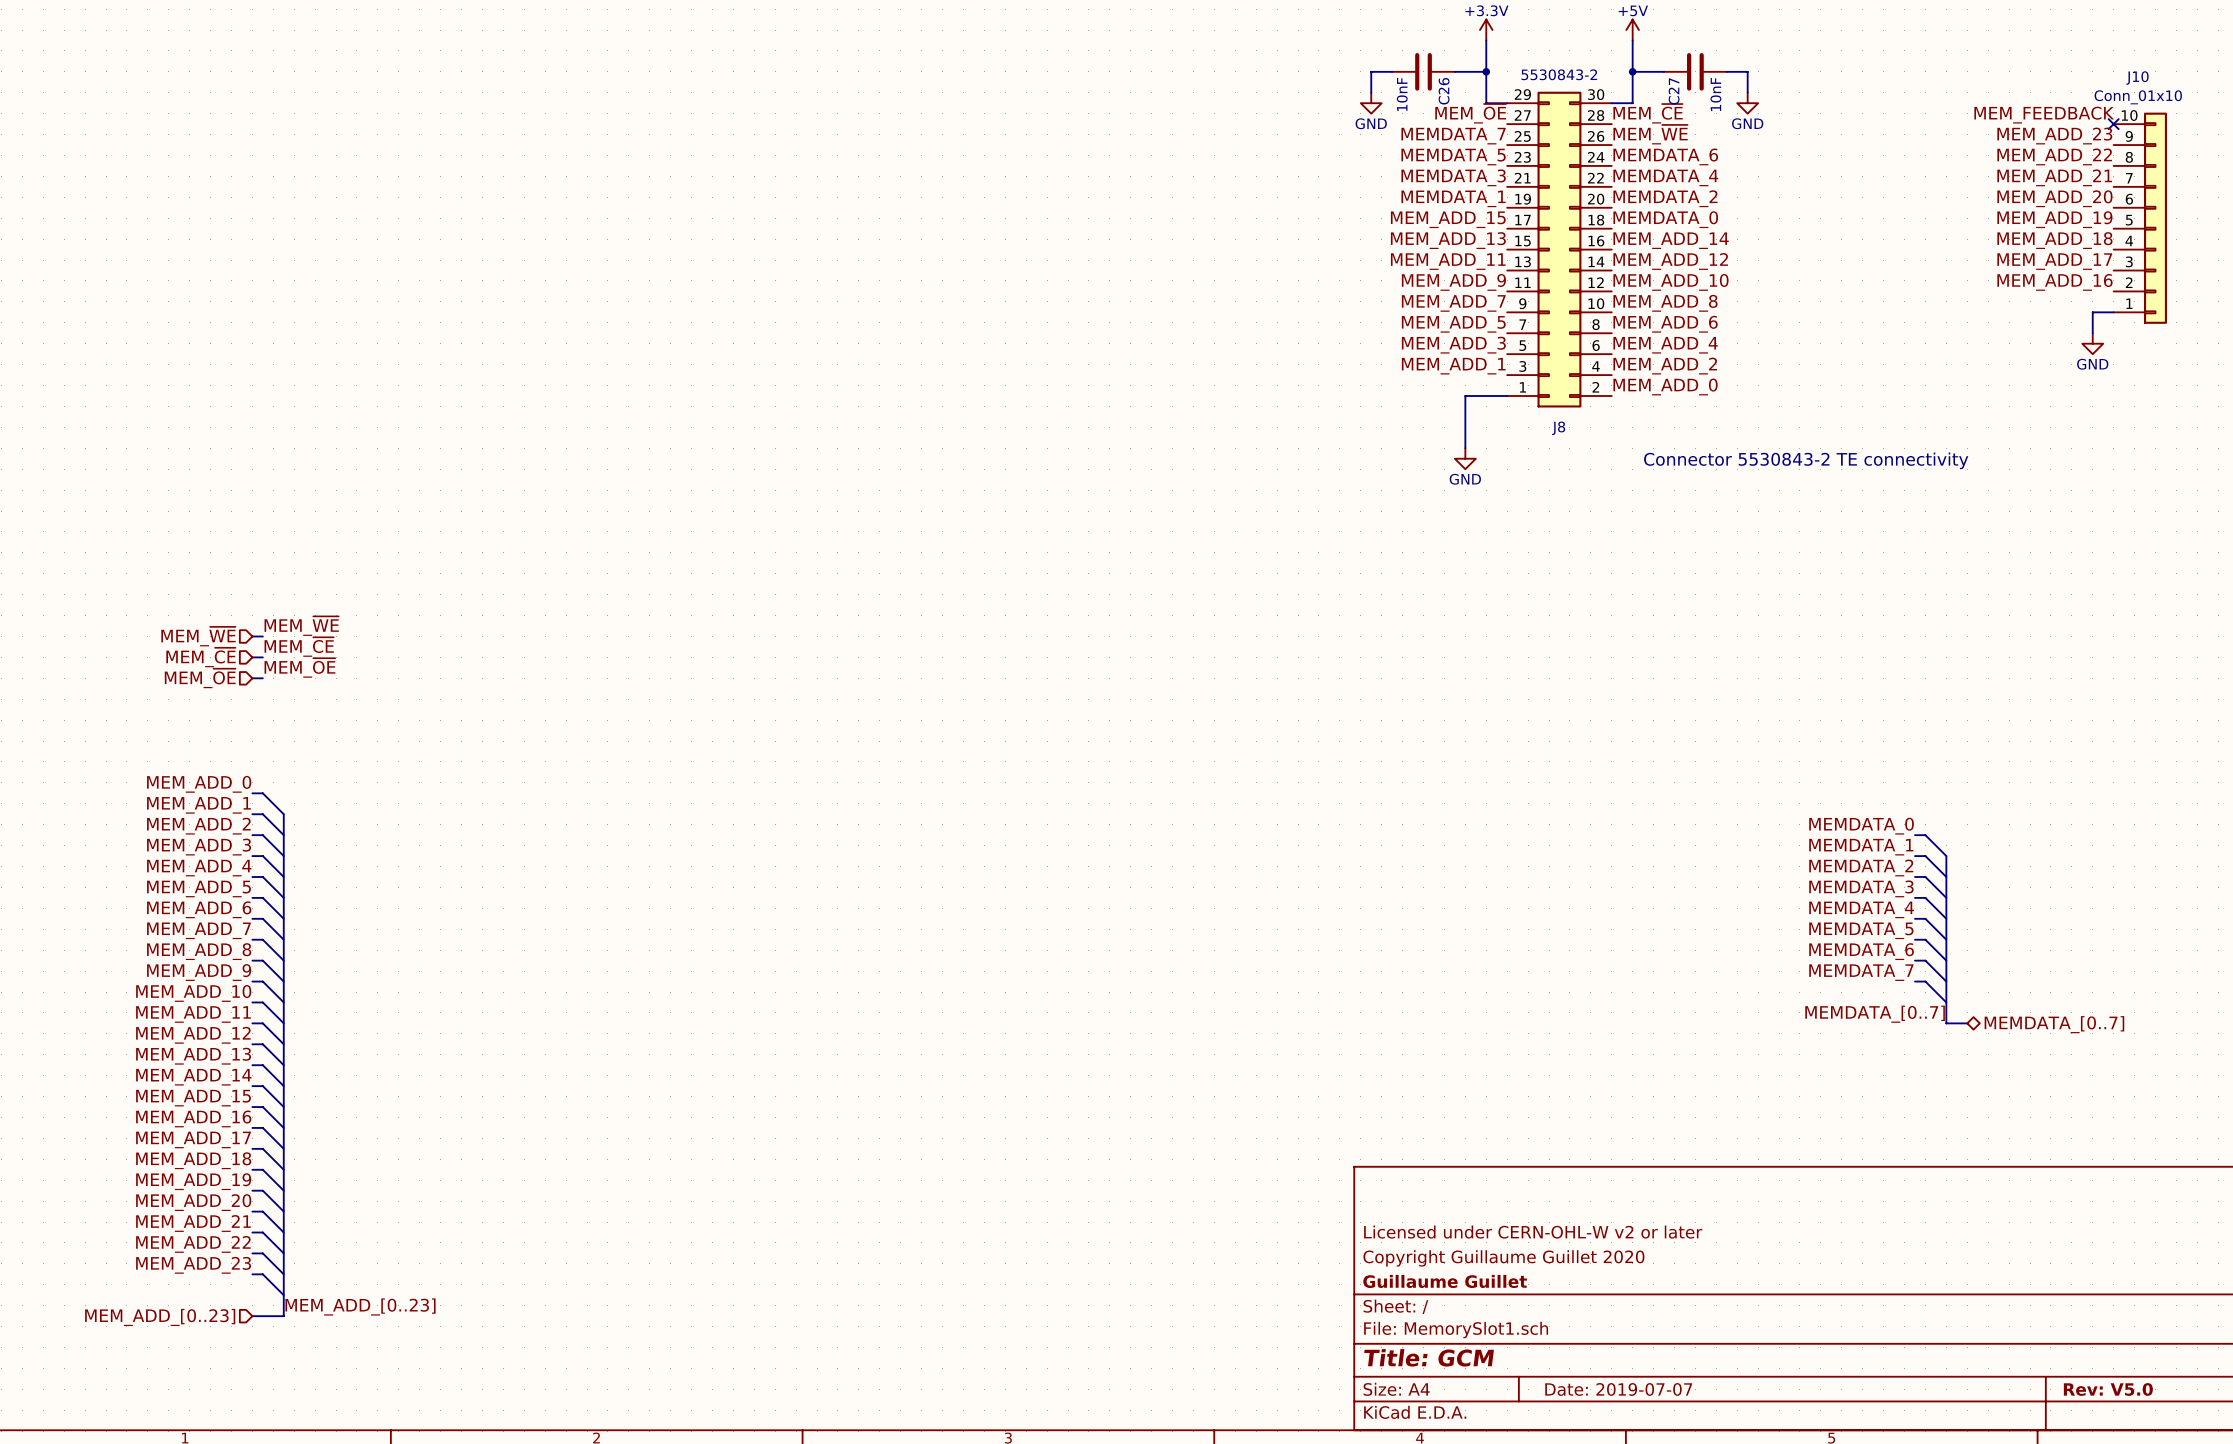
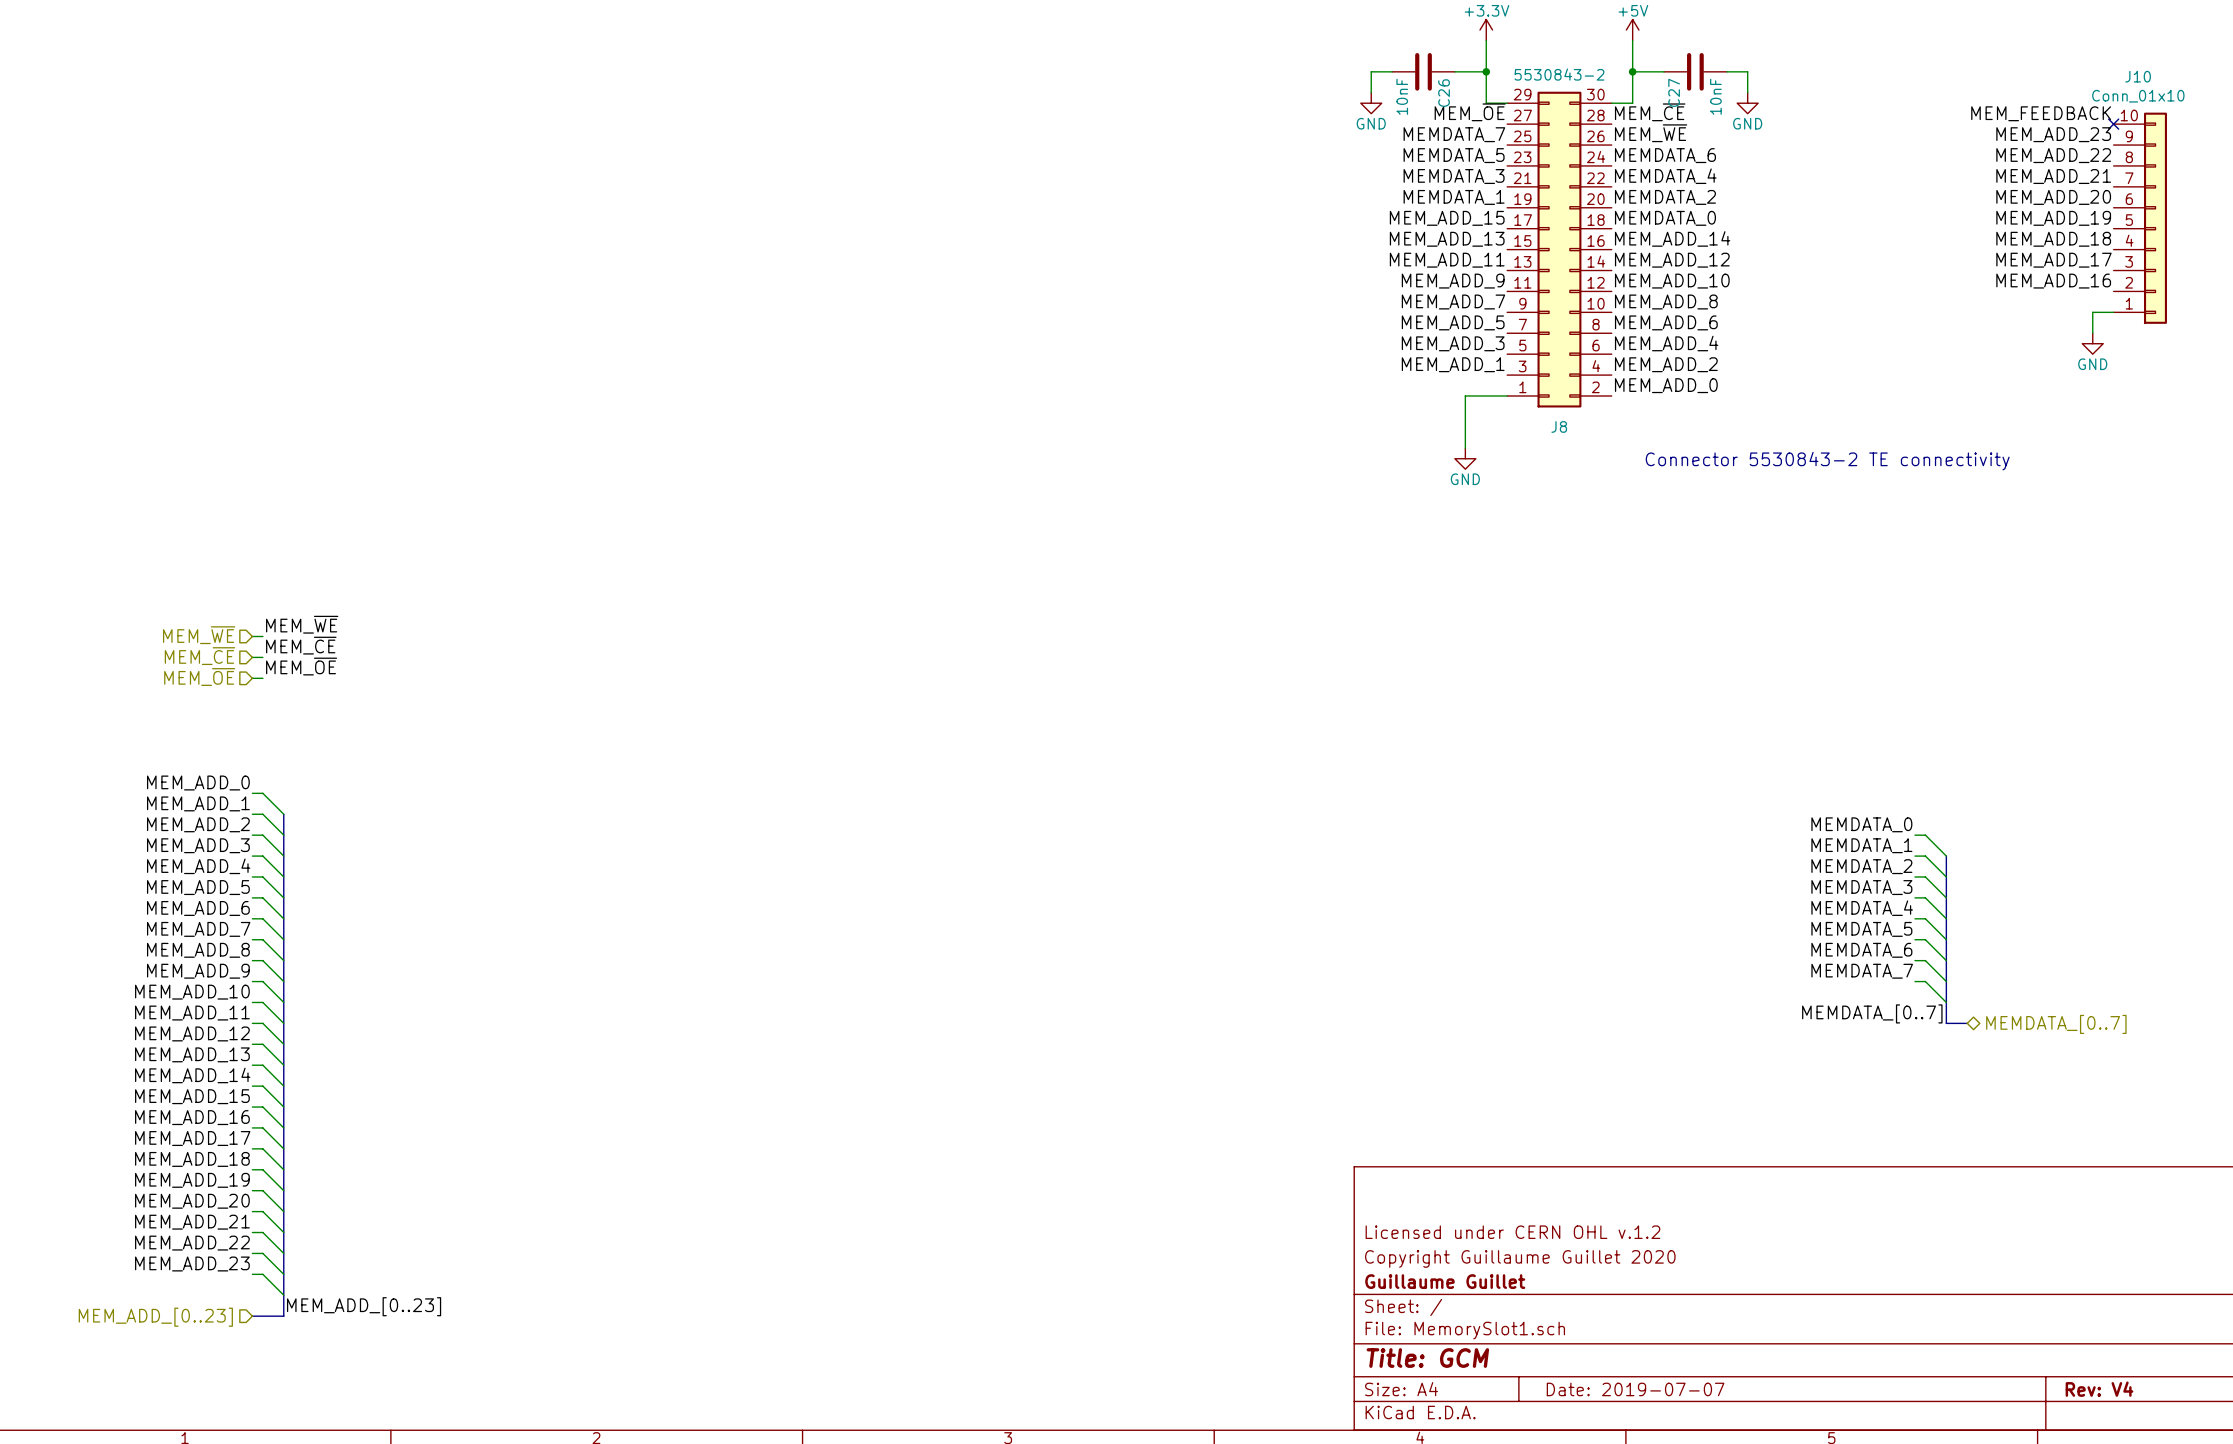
title block: Licensed under CERN-OHL-W v2 or later (1533, 1232) -> Licensed under CERN OHL v.1.2 (1512, 1232)
title block: Rev: V5.0 (2108, 1389) -> Rev: V4 (2099, 1389)

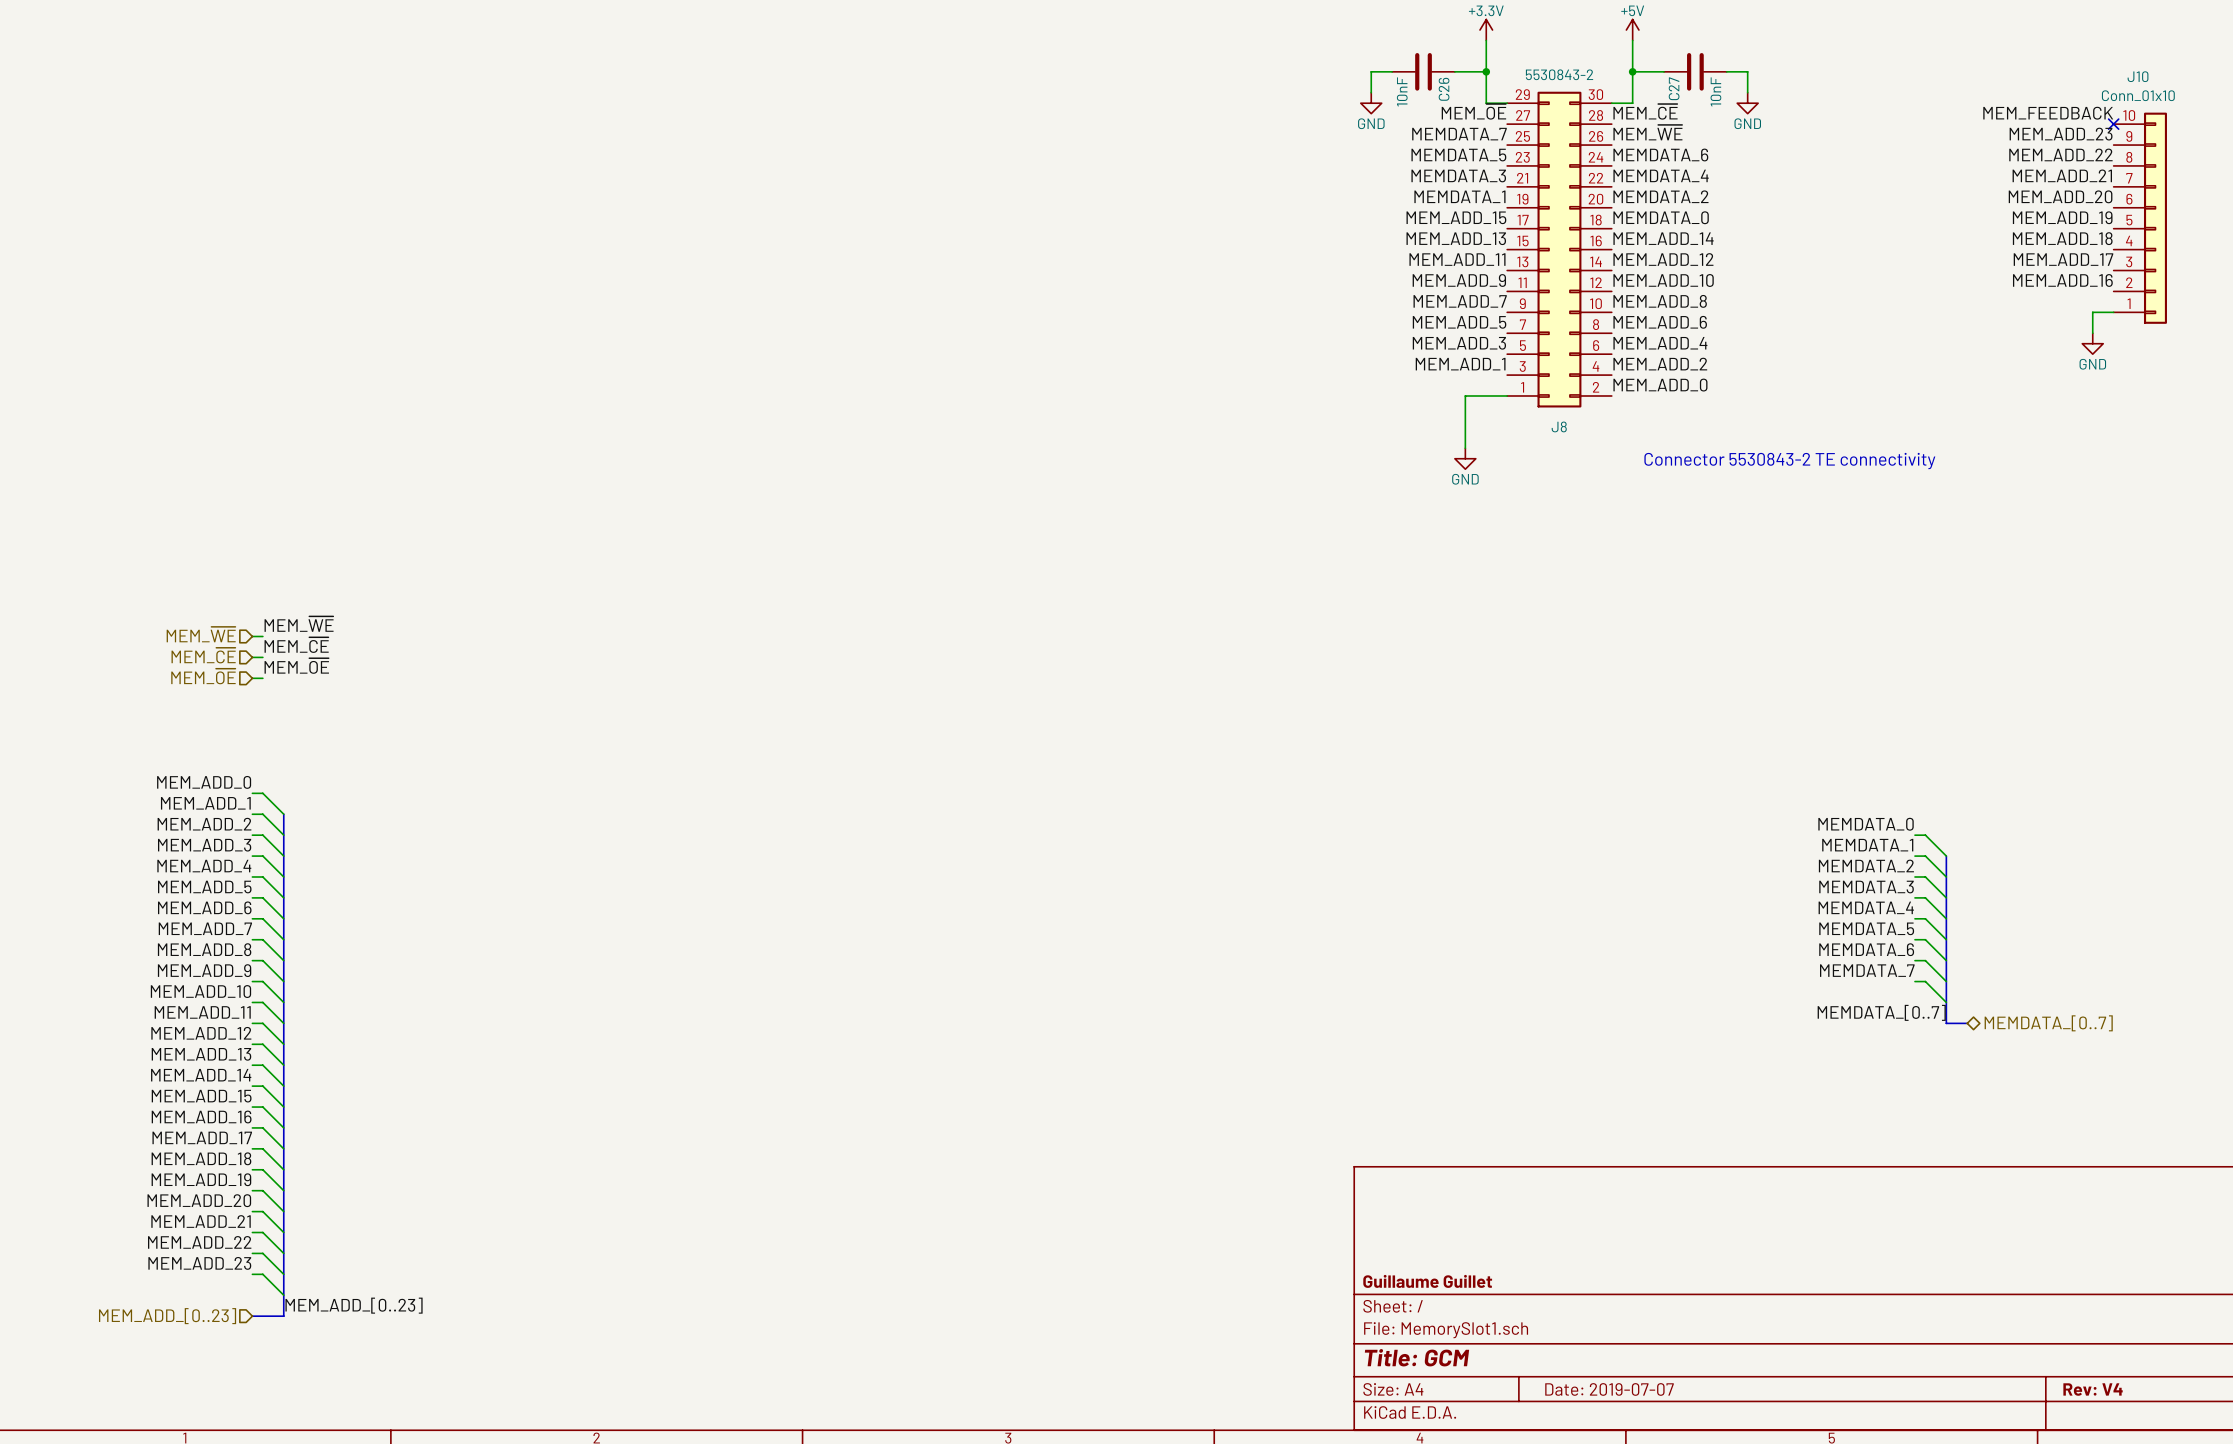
title block: Licensed under CERN OHL v.1.2 (1512, 1232) -> none
title block: Copyright Guillaume Guillet 2020 (1520, 1258) -> none

